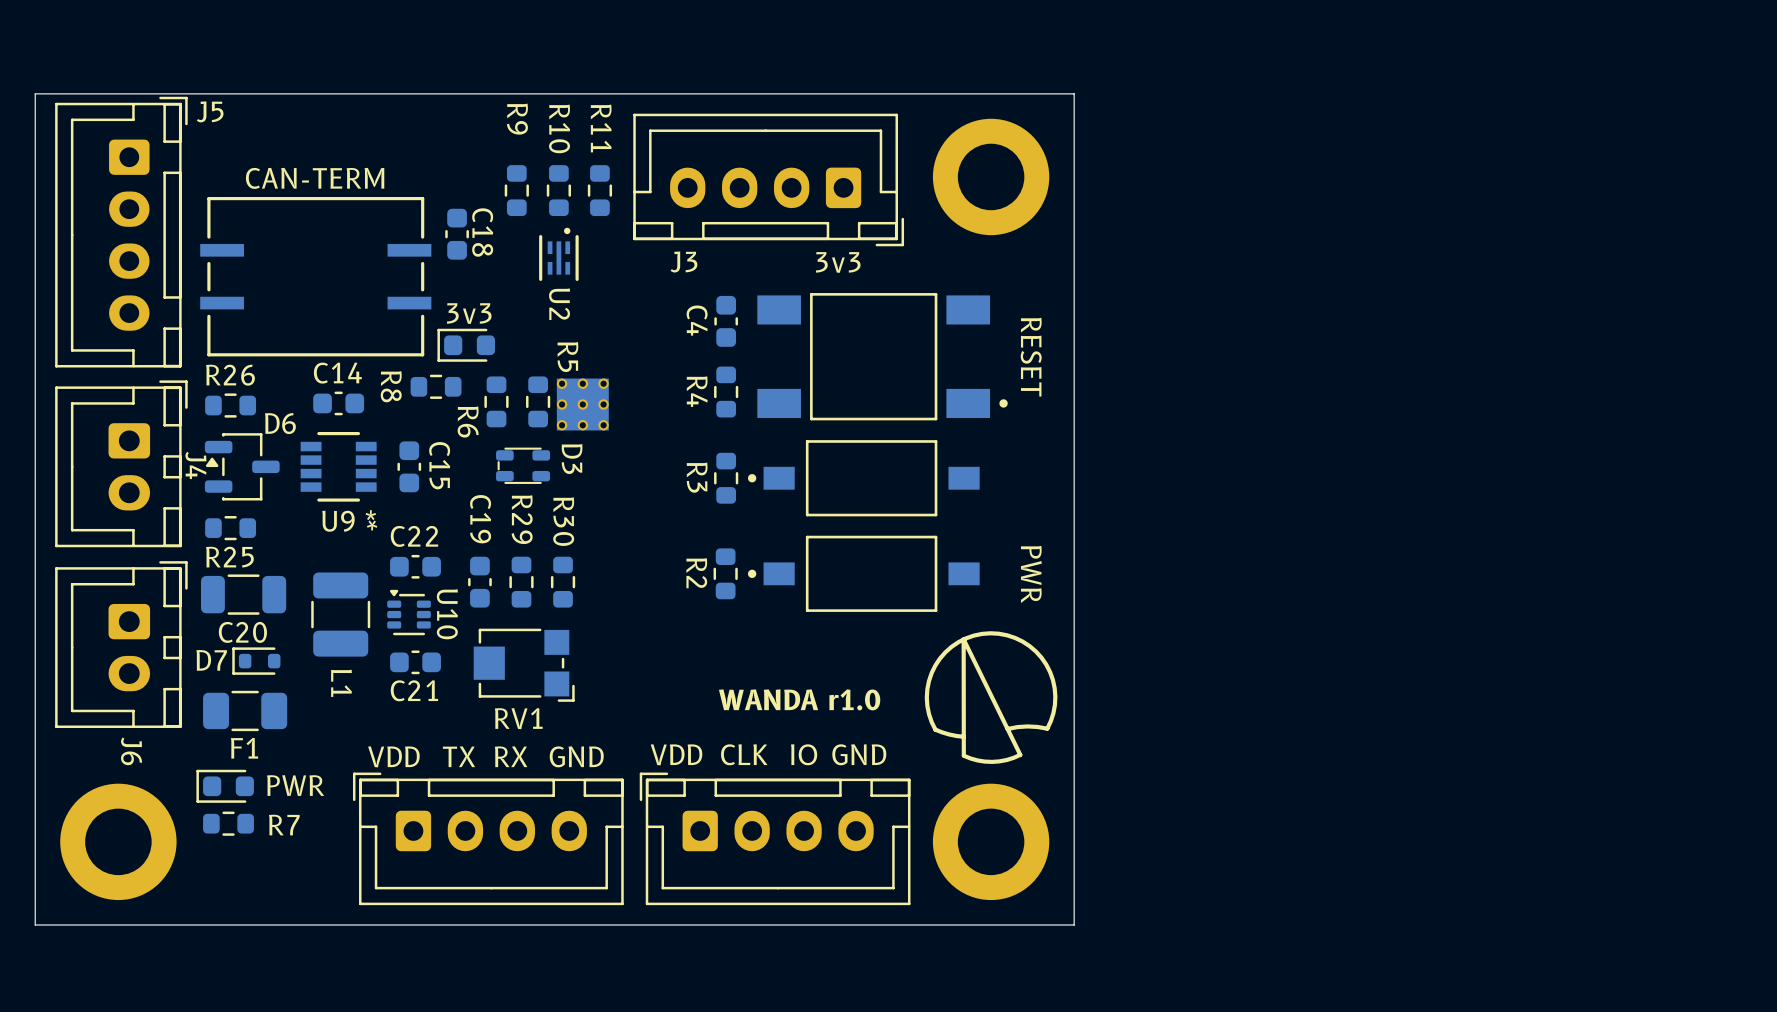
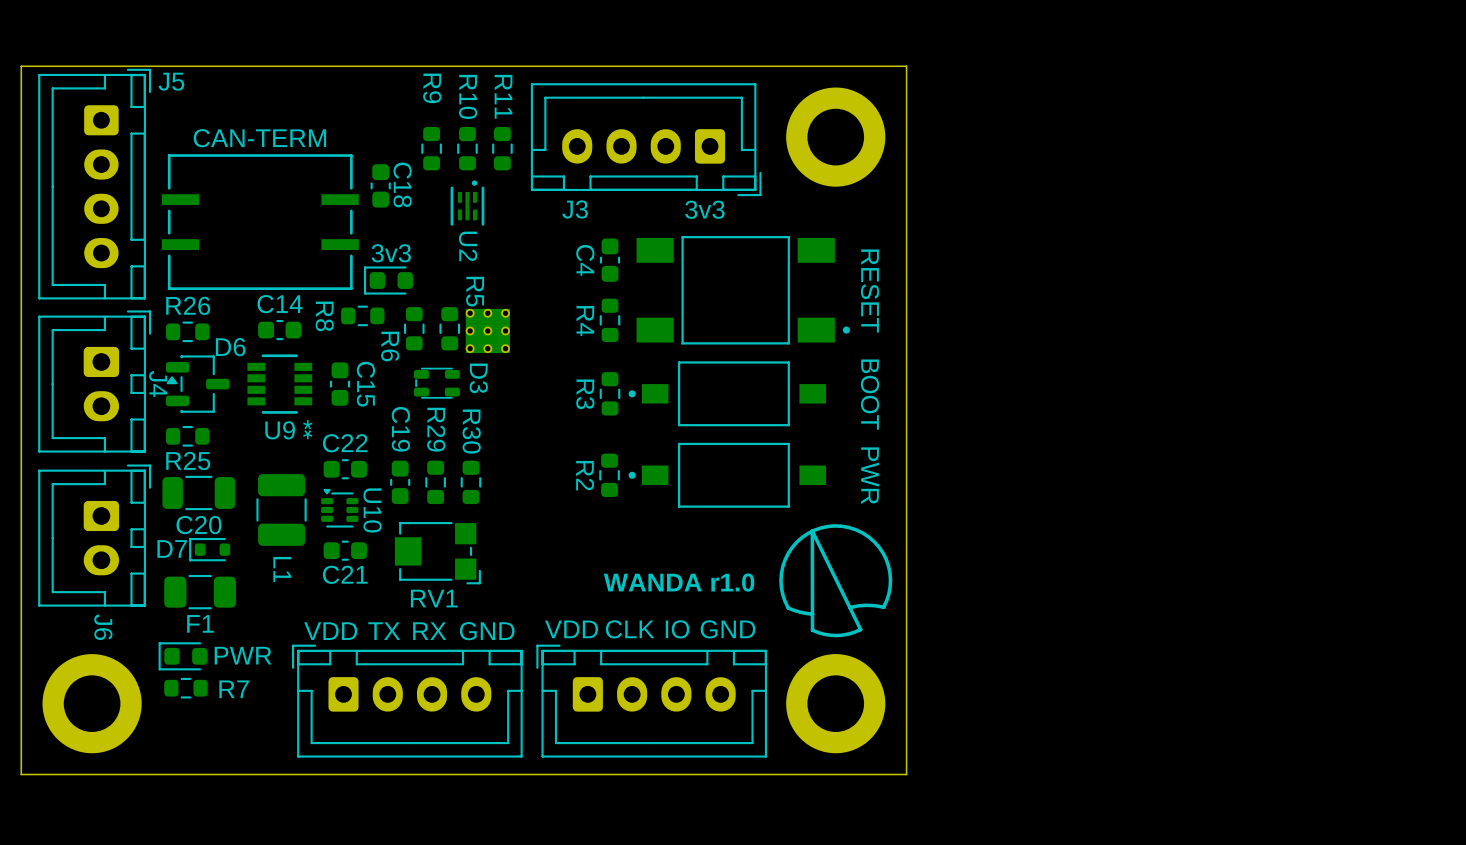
part value: none -> BOOT (870, 394)

